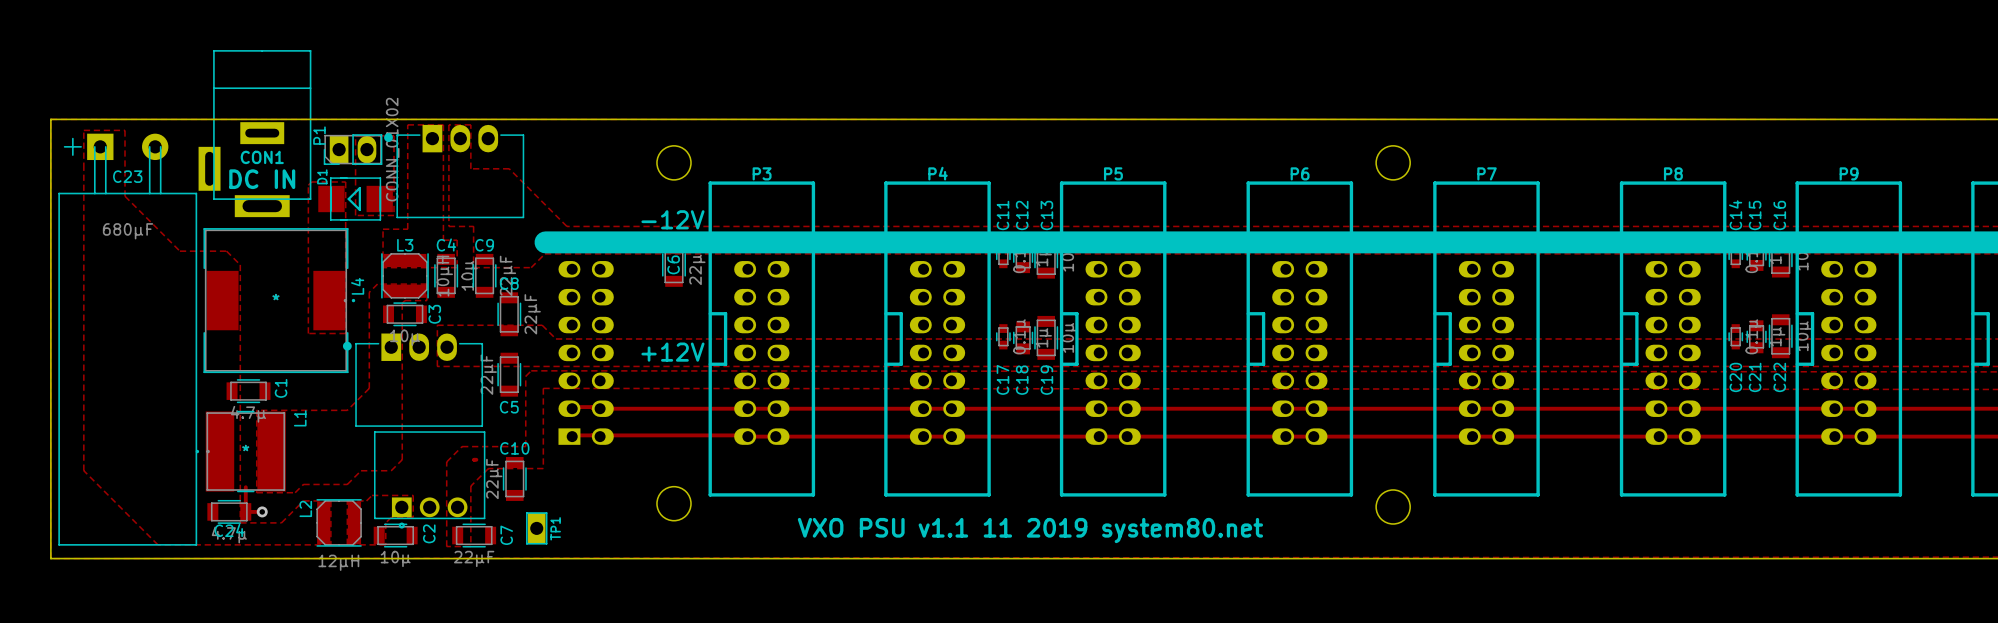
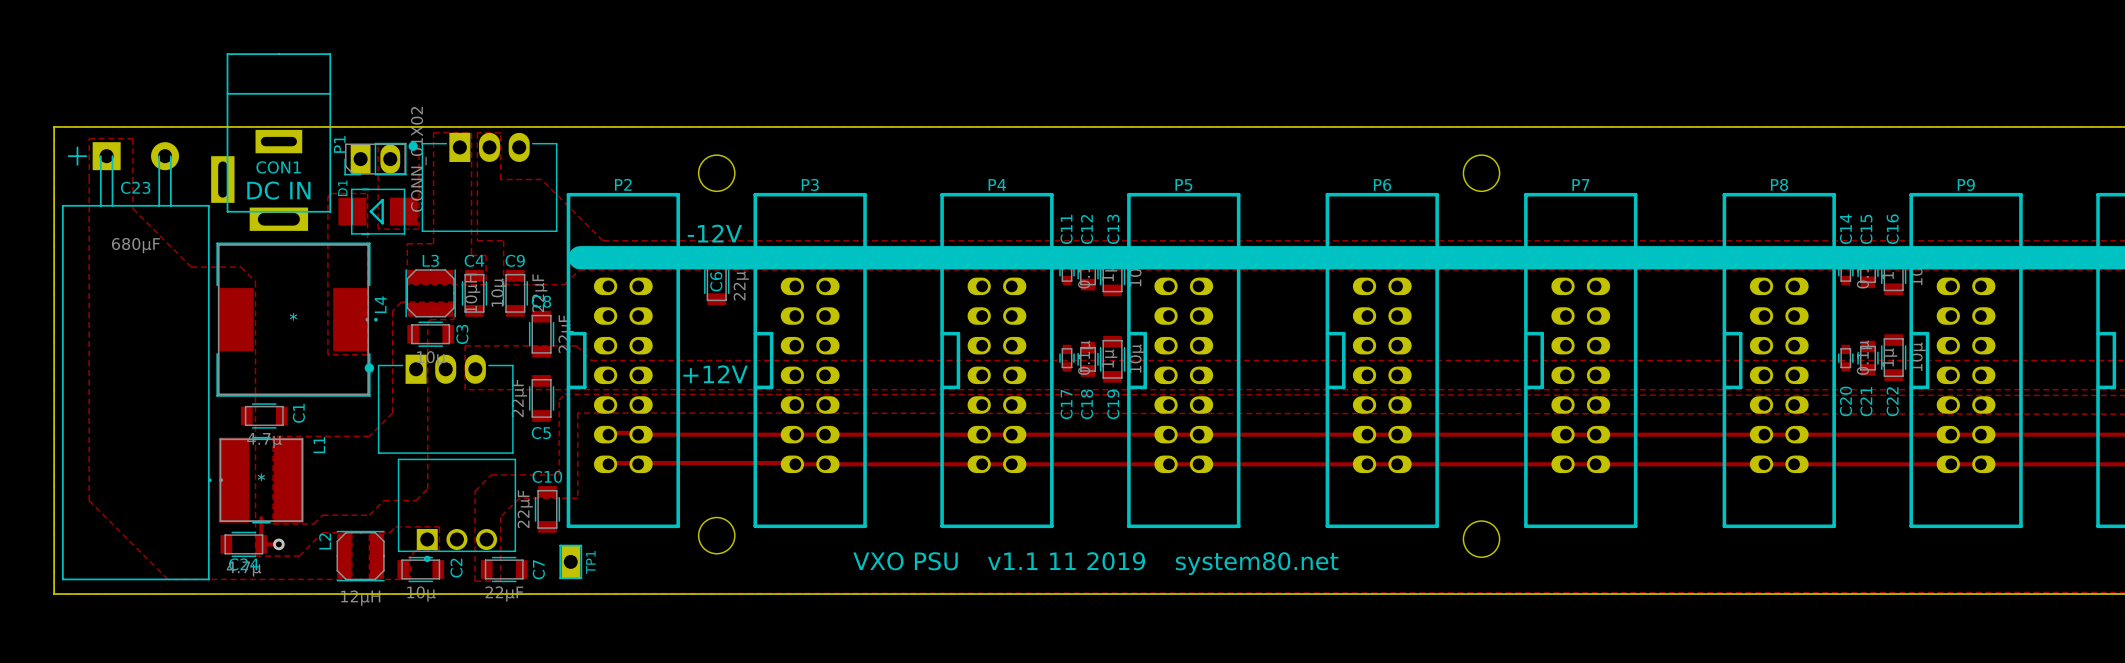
P2 side: bottom (586, 338) -> top (623, 360)
track: (474, 459) (476, 459) -> none

